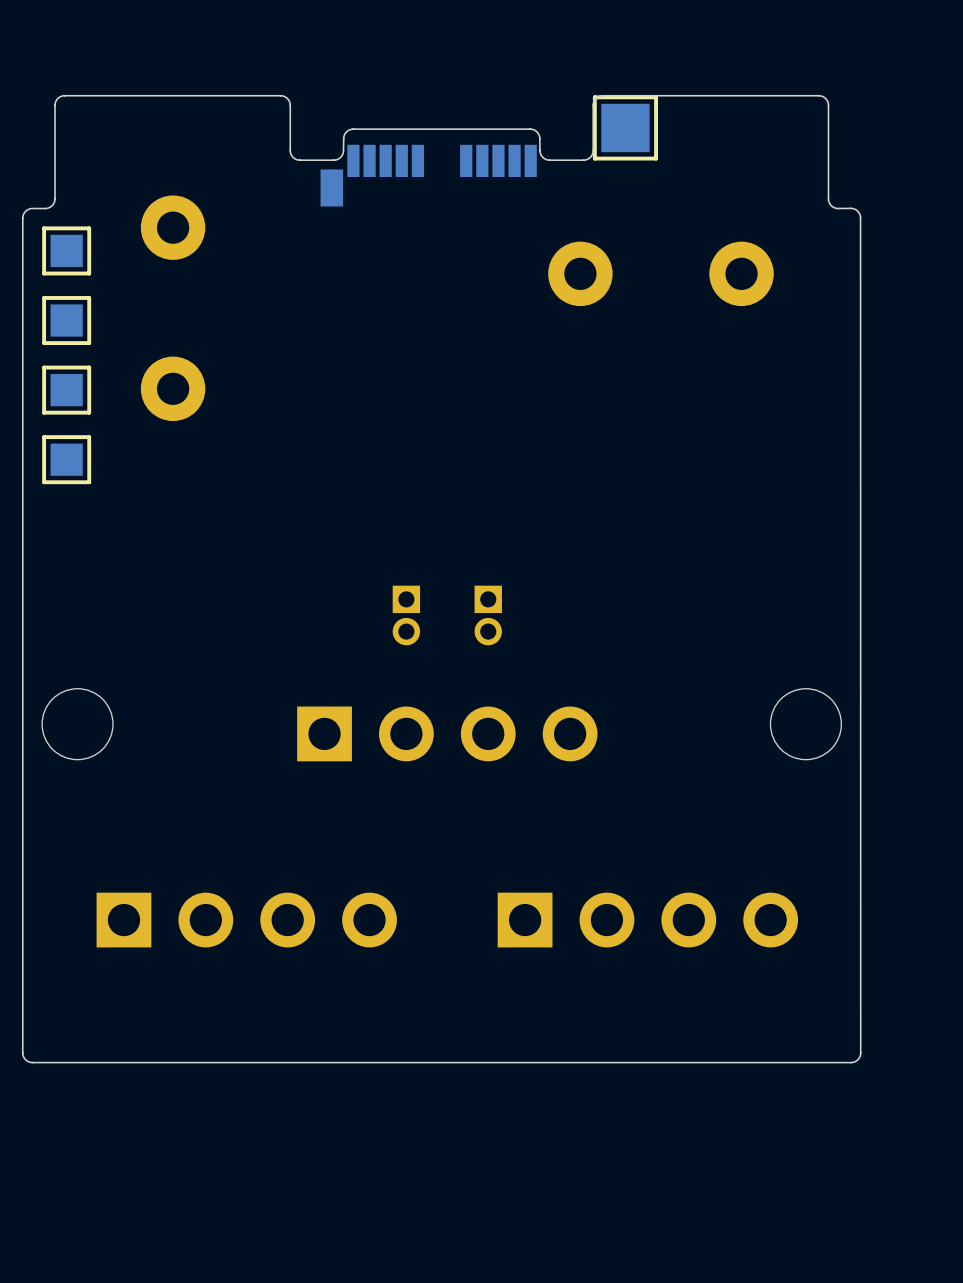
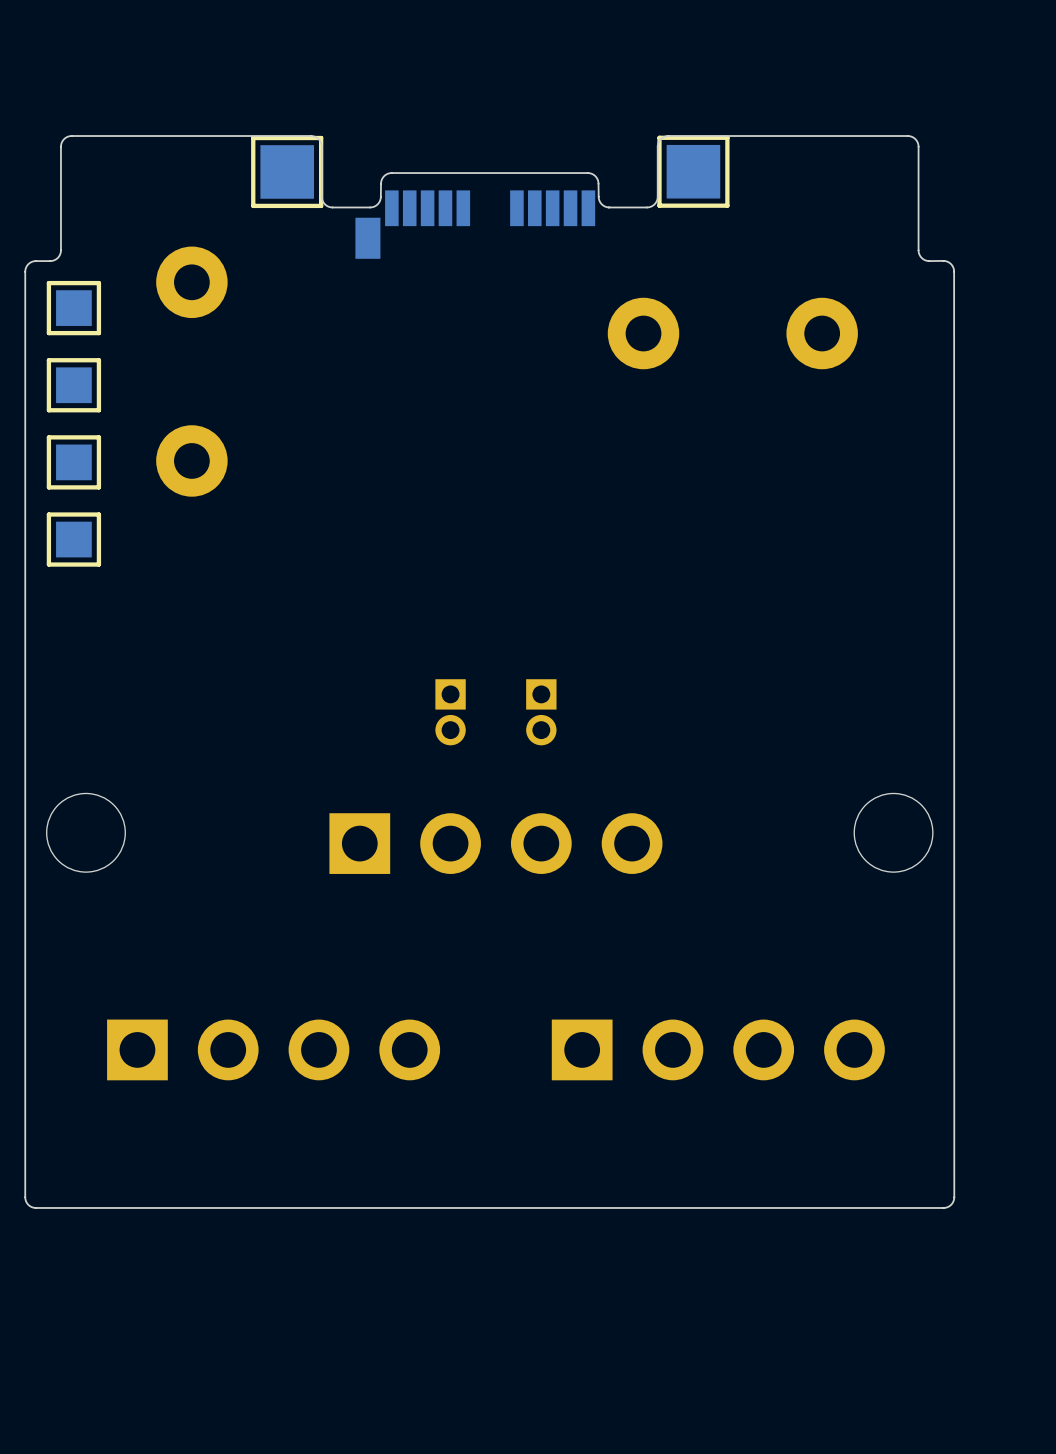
part: none -> (287, 171)

